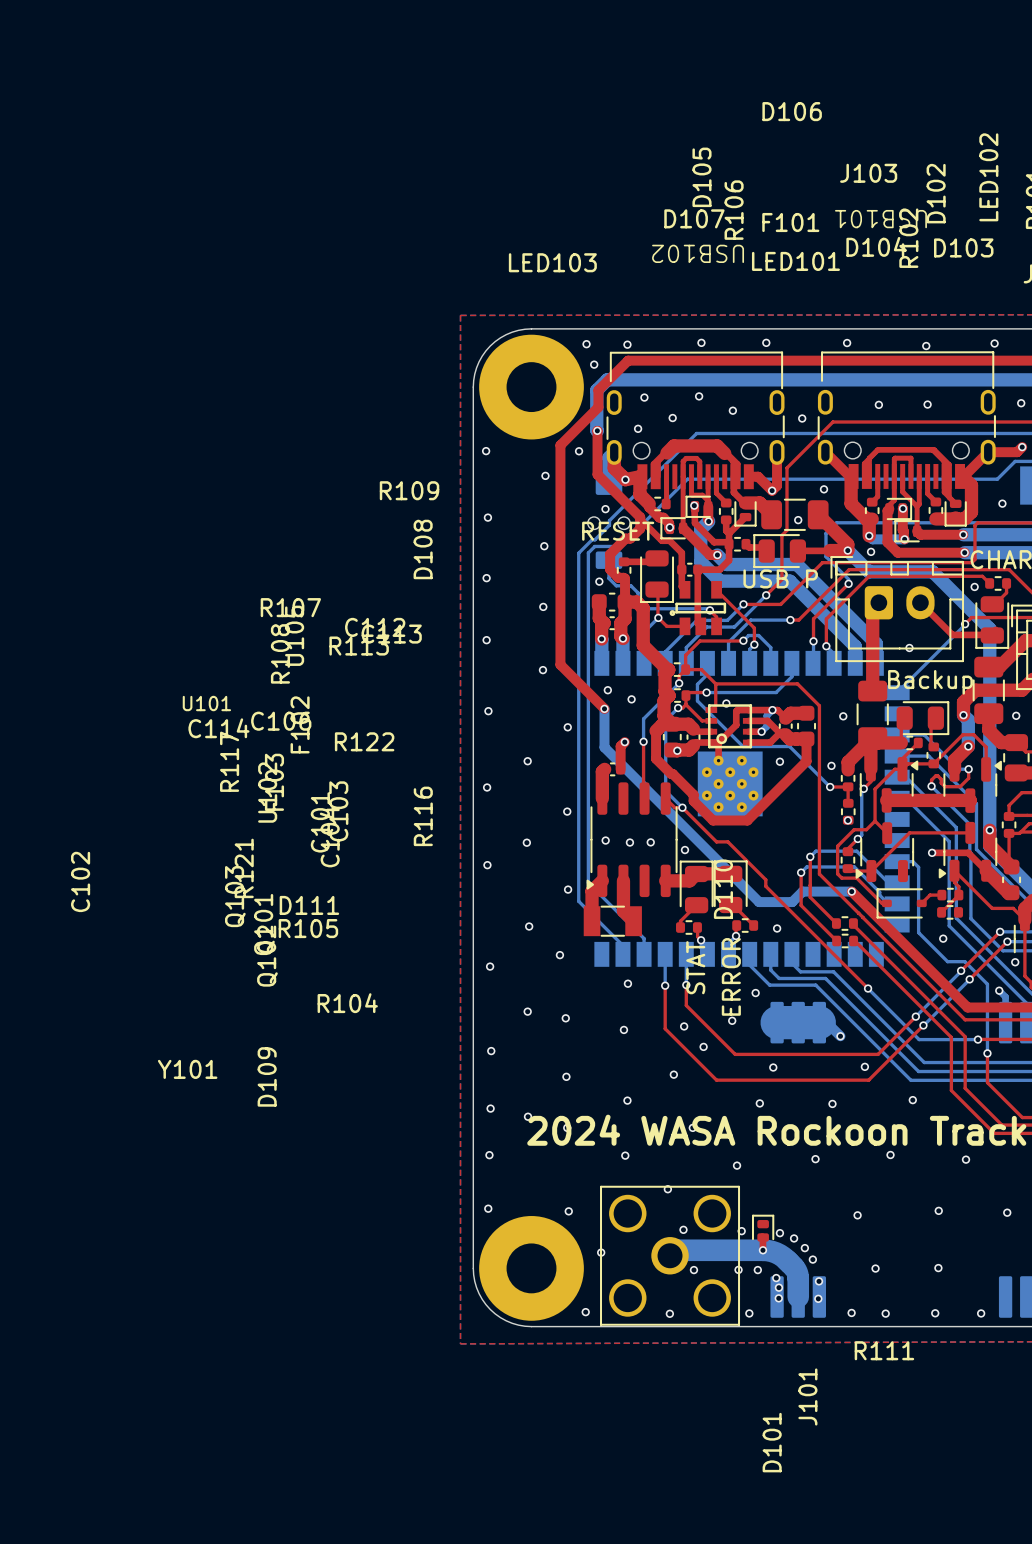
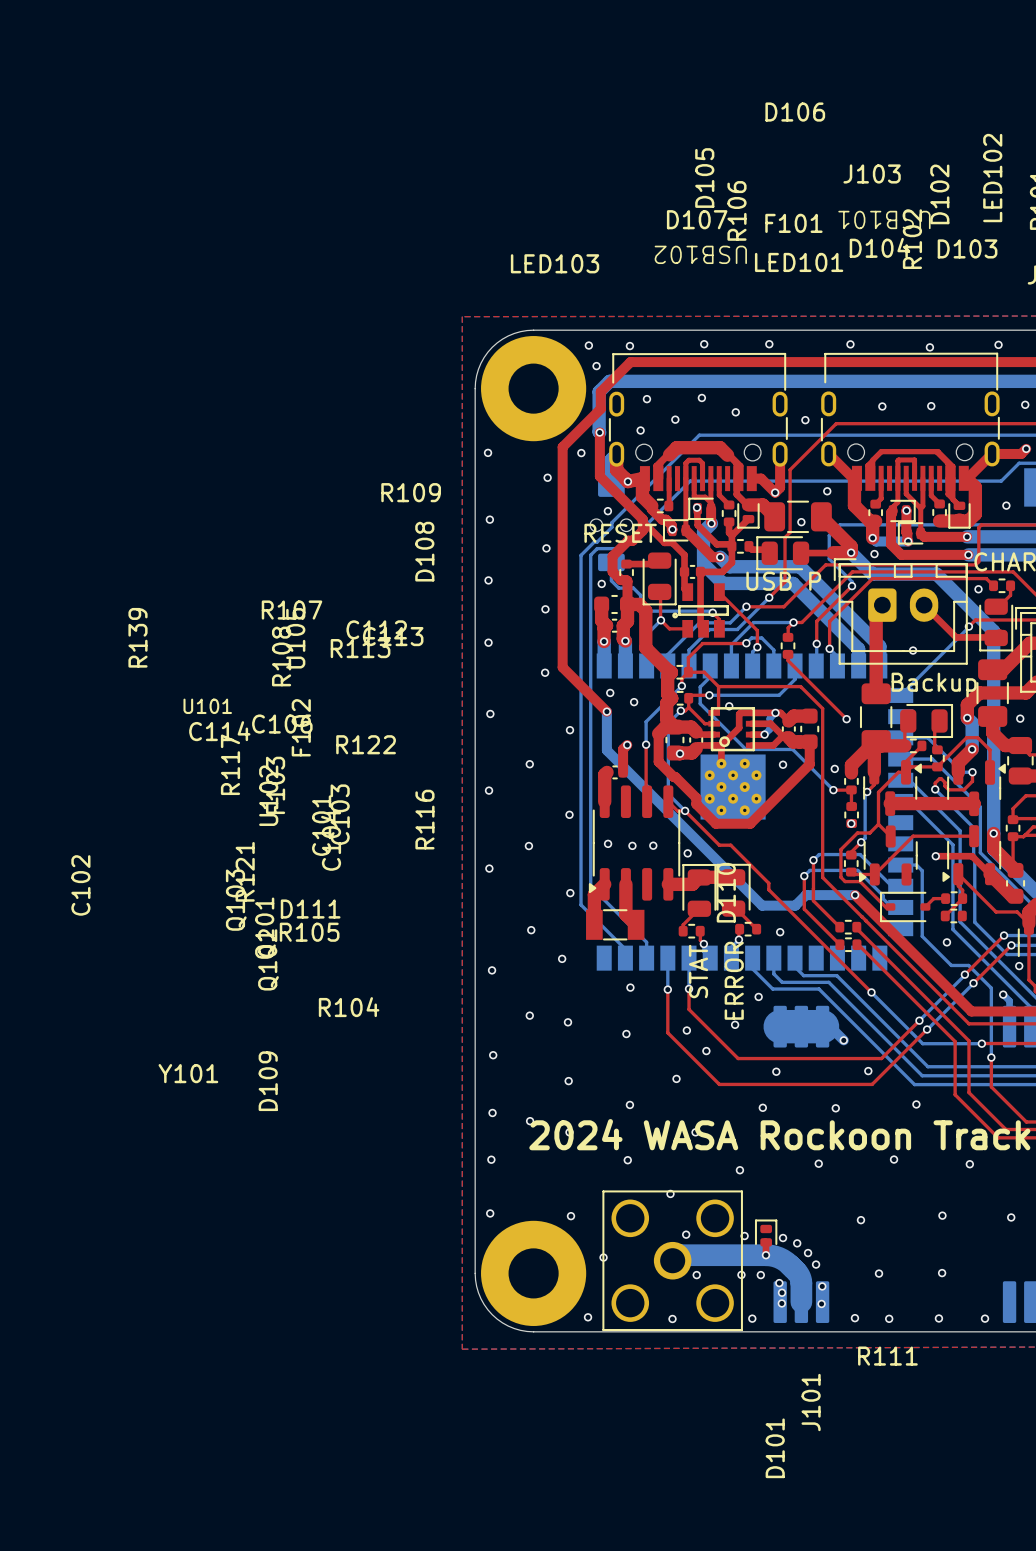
top track: none -> (793, 622) (788, 627) (788, 635)
R139: none -> (788, 645)
top track: none -> (788, 654) (788, 660) (846, 719)

